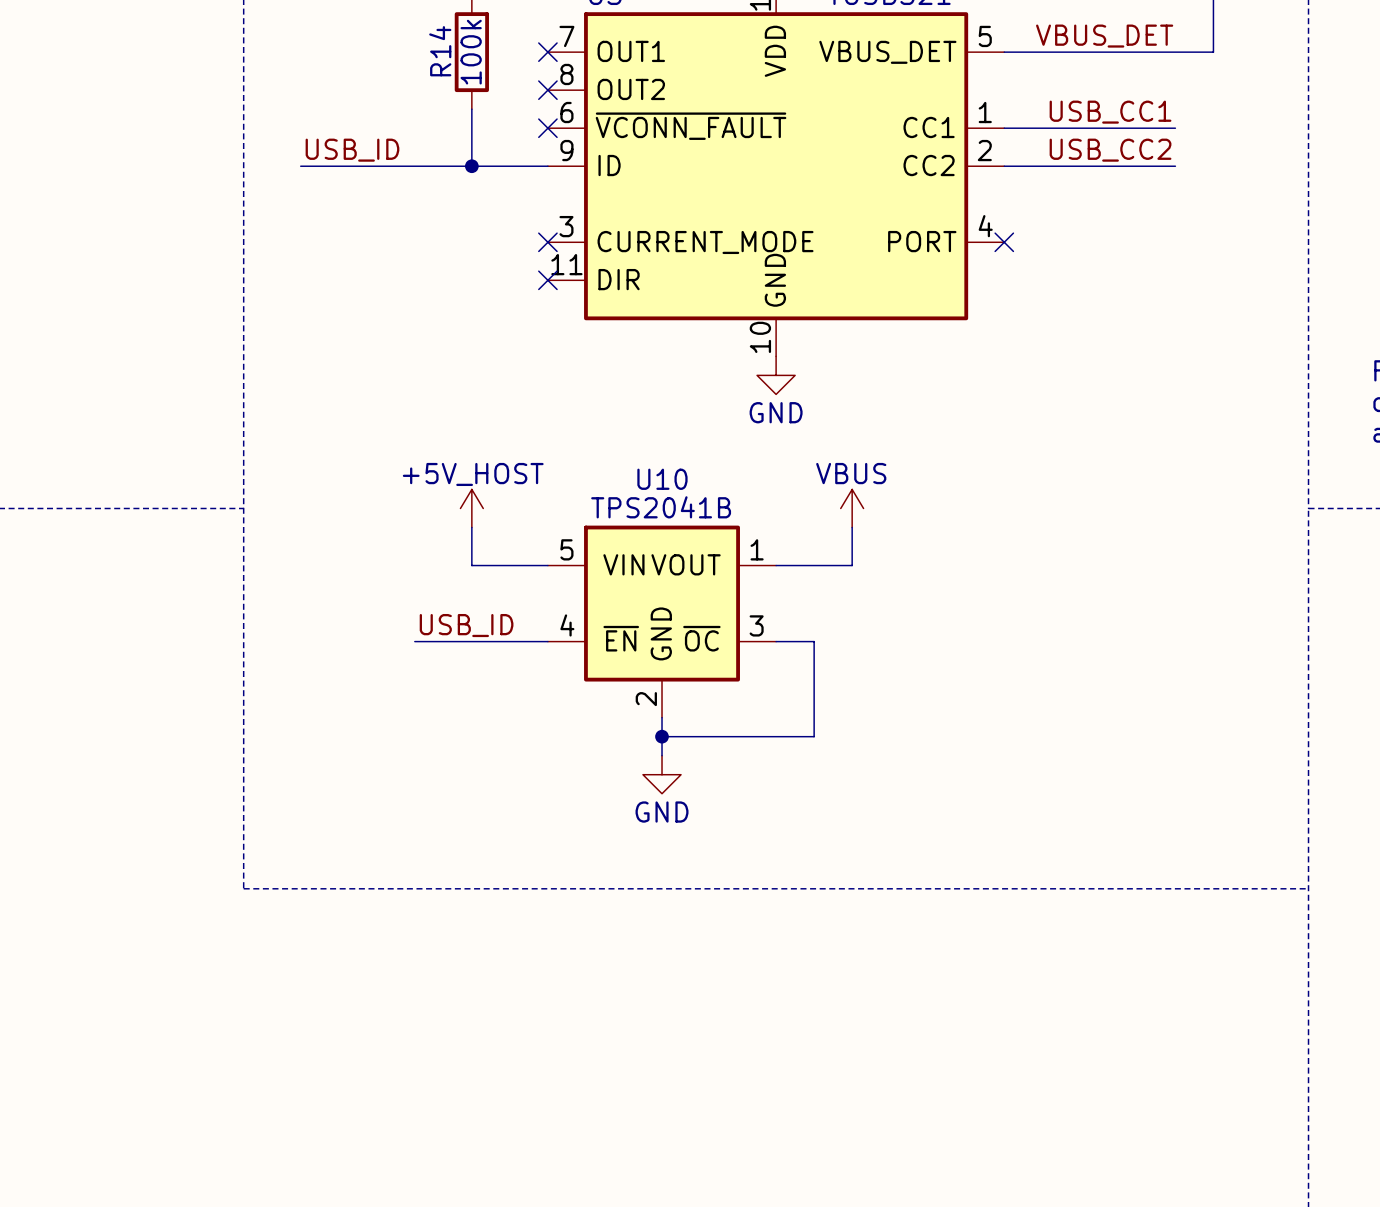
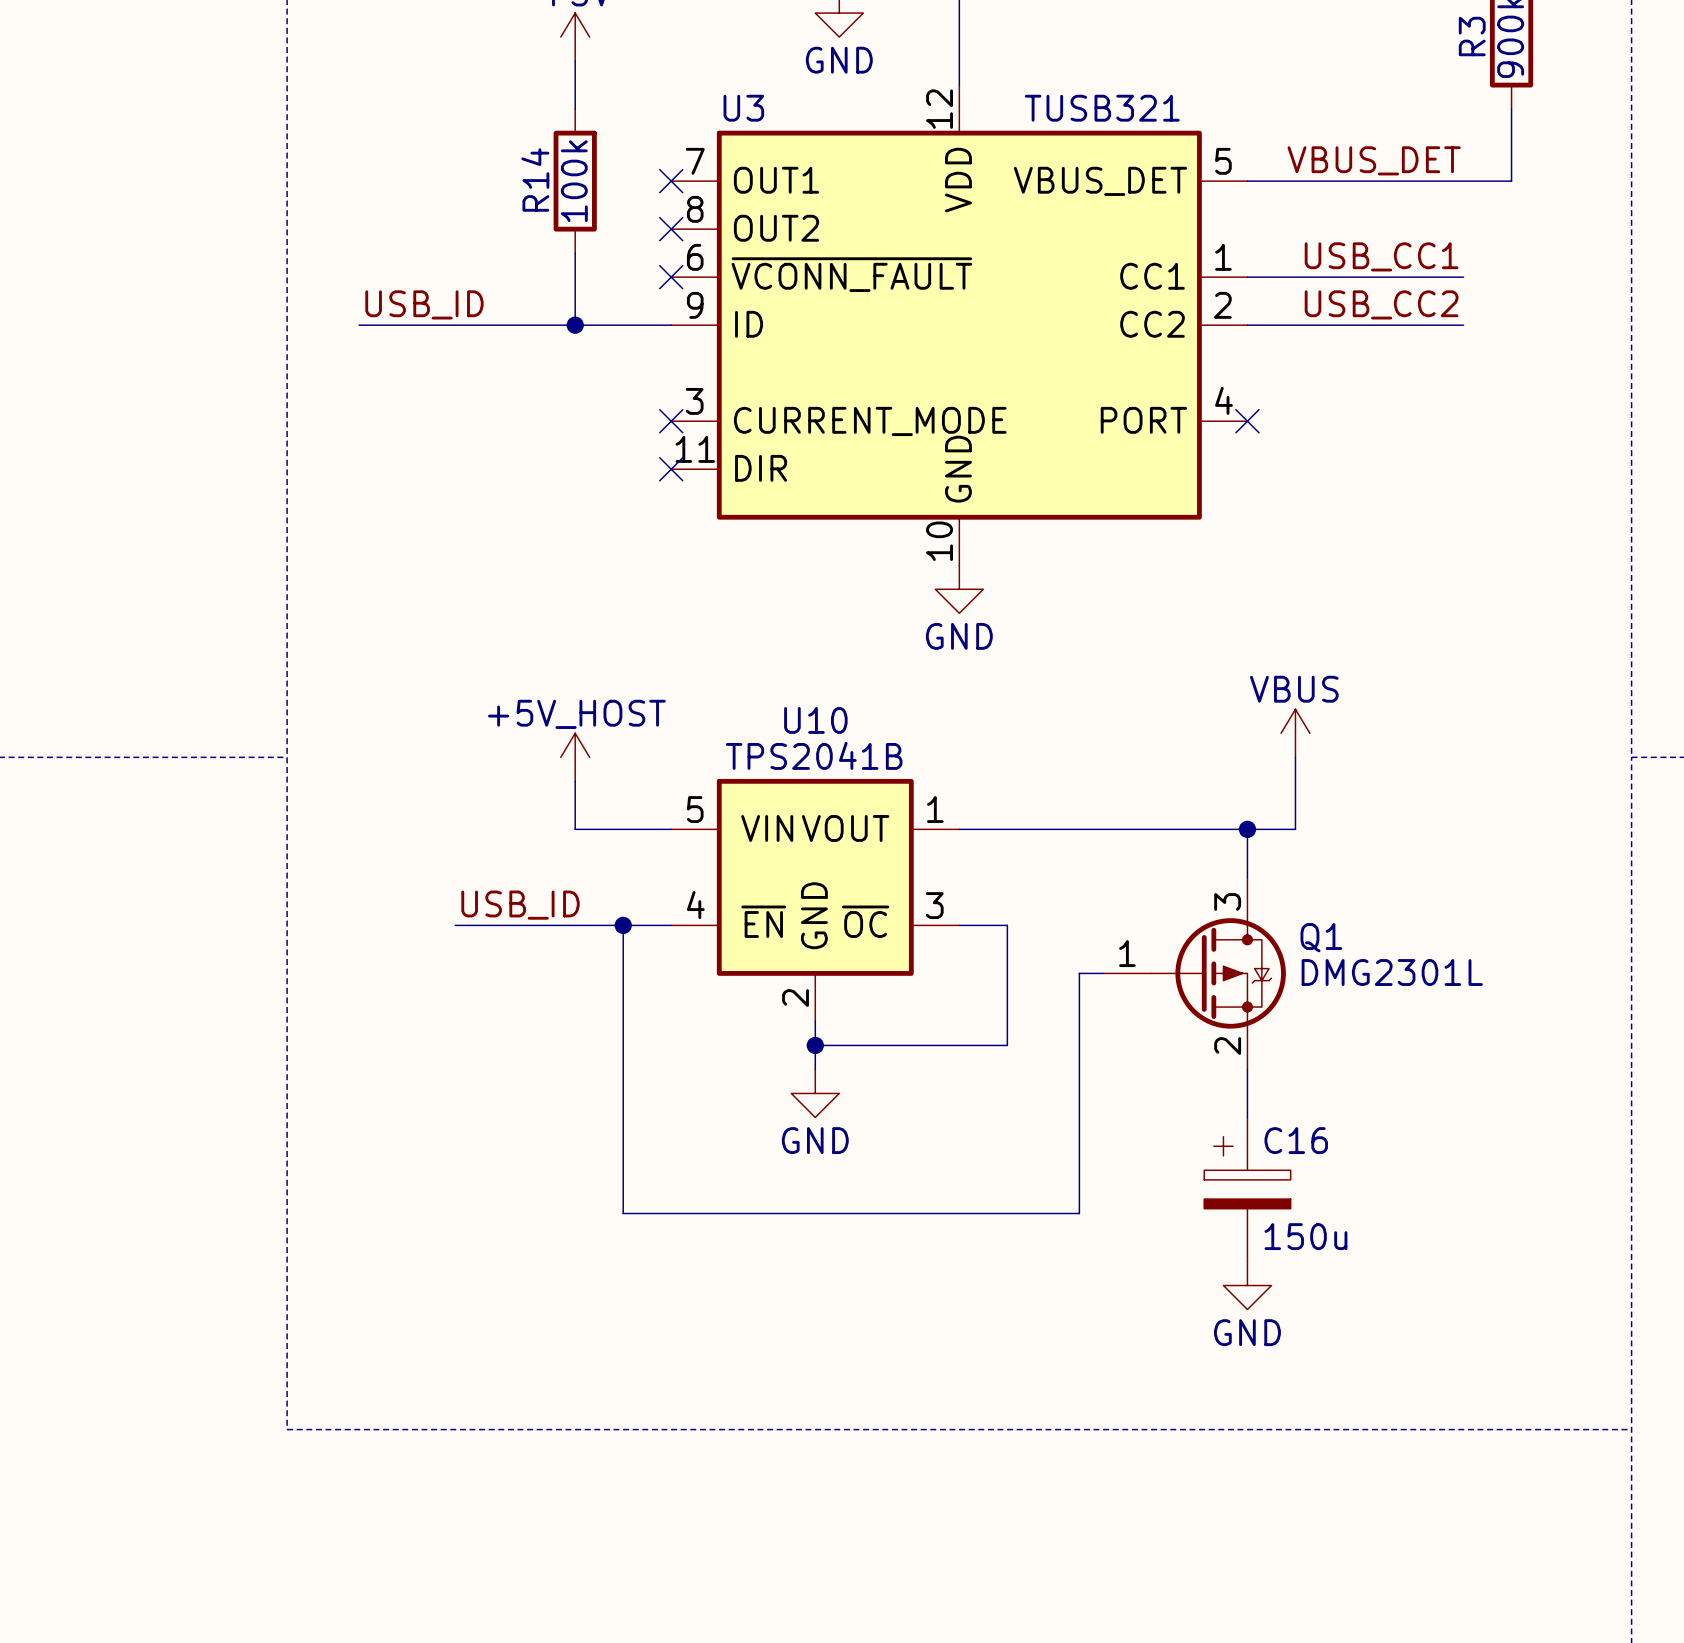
power symbol position: VBUS (852, 508) -> VBUS (1295, 733)
wire: (852, 527) (852, 565) -> (1295, 757) (1295, 829) (1055, 829)
wire: none -> (1247, 829) (1247, 877)
junction: none -> (1247, 829)
label position: USB_ID (466, 625) -> USB_ID (520, 905)
wire: none -> (455, 925) (503, 925)
wire: none -> (623, 925) (623, 1213) (1079, 1213) (1079, 973) (1103, 973)
junction: none -> (623, 925)
Q1: none -> DMG2301L (1194, 973)
wire: none -> (1247, 1069) (1247, 1117)
C16: none -> 150u (1247, 1189)
line: (243, 888) (1308, 888) -> (287, 1237) (287, 1429) (1631, 1429)
power symbol: none -> GND (1247, 1285)

